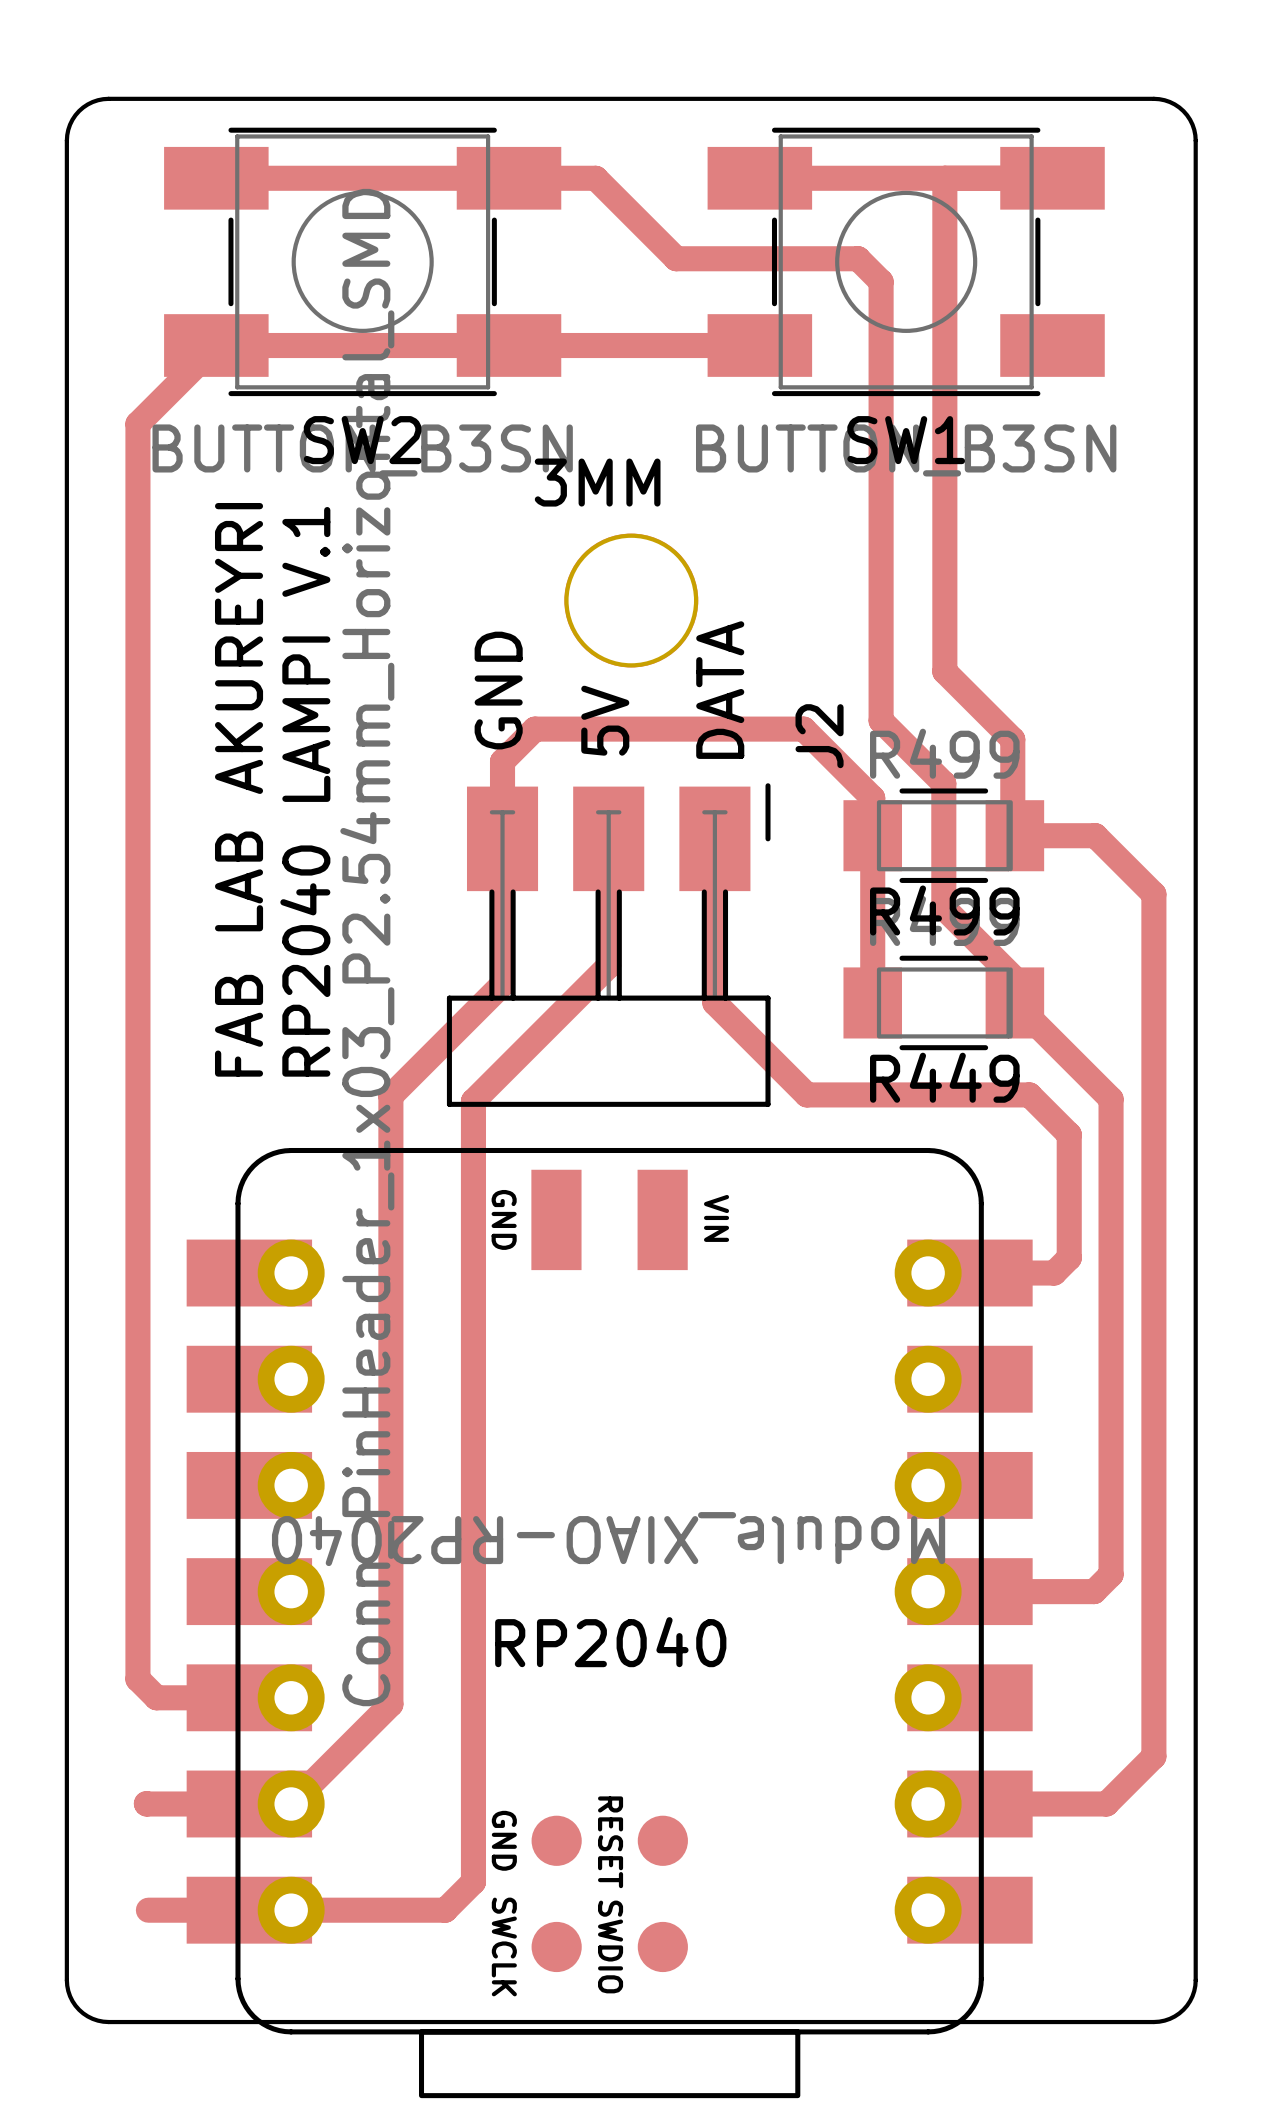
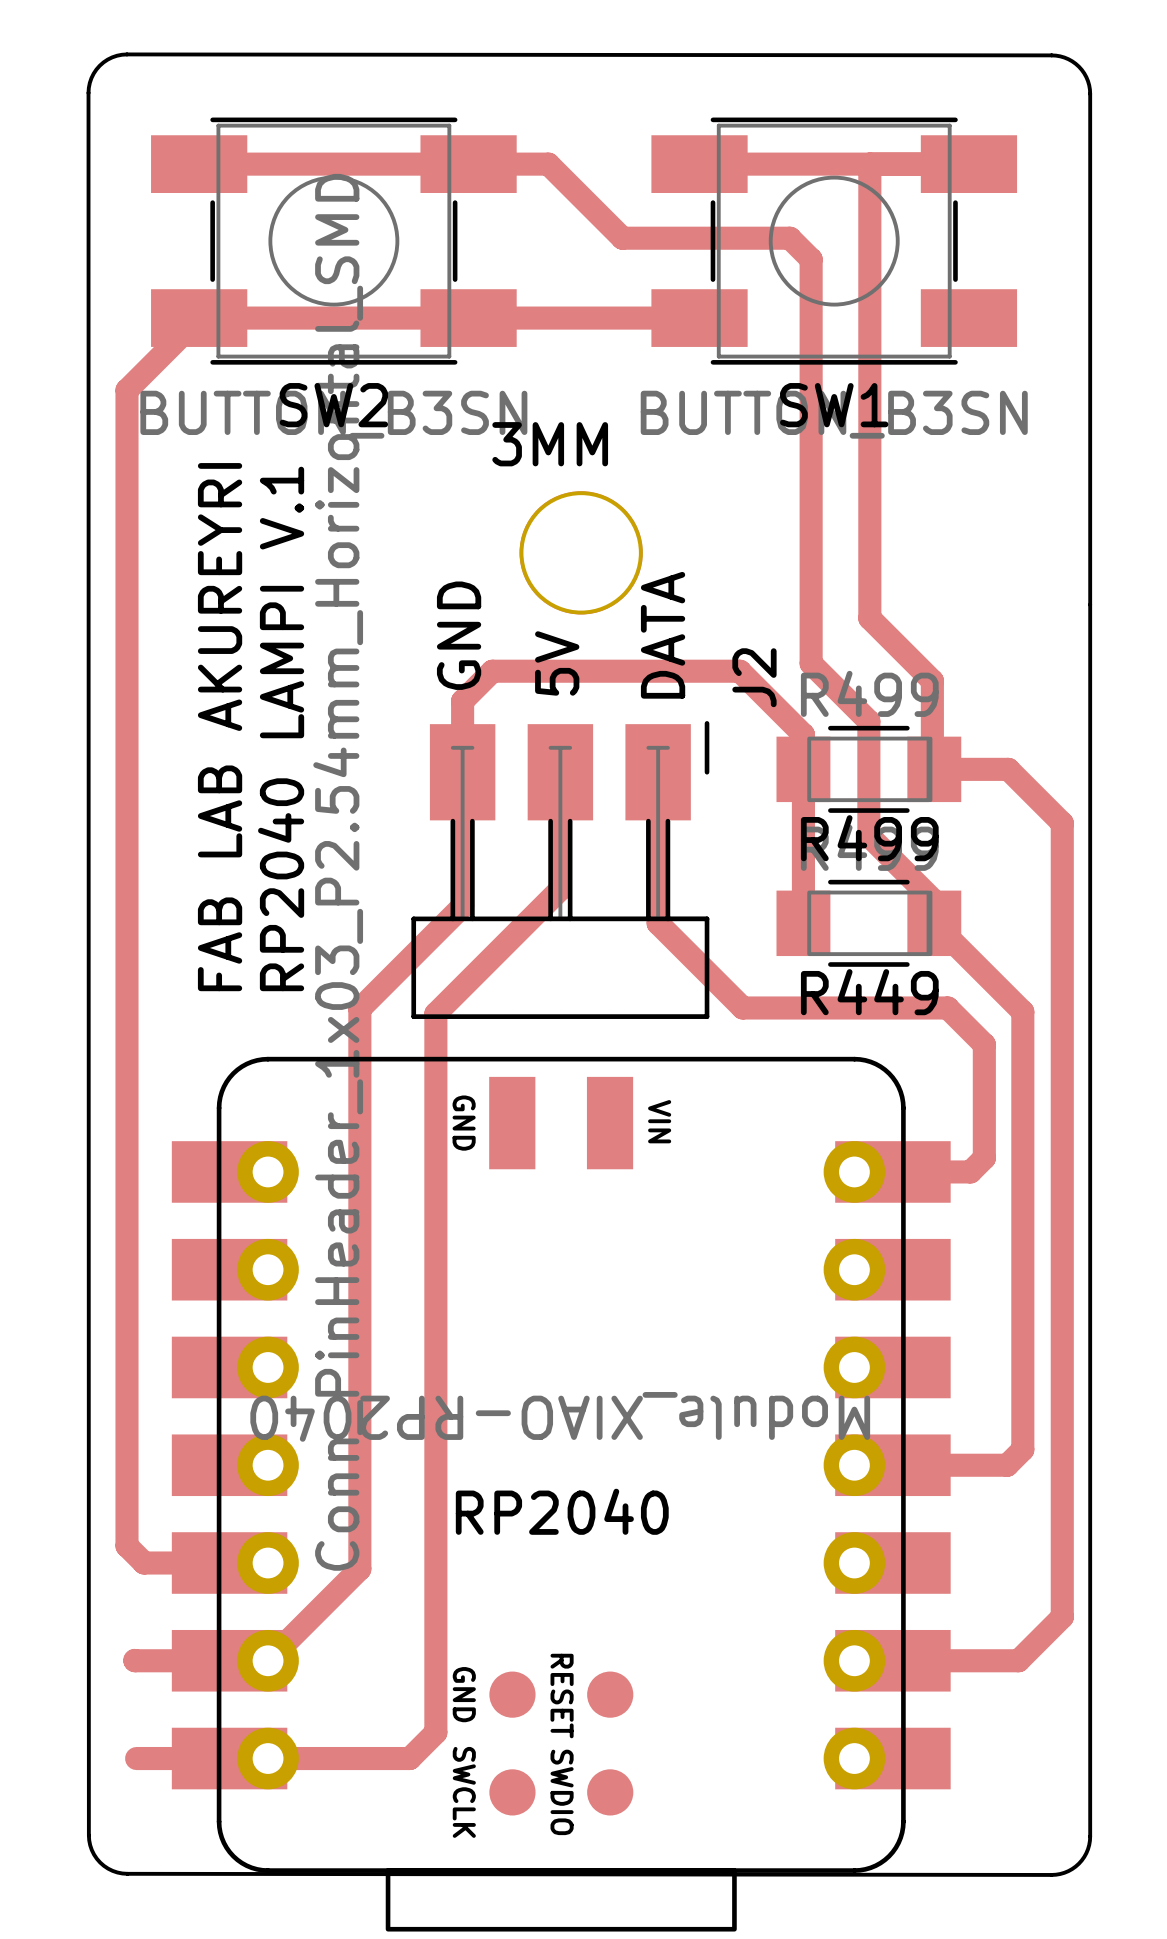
board edge: (108, 98) (1153, 98) (1174, 104) (1190, 119) (1195, 140) (1195, 1980) (1190, 2001) (1174, 2016) (1153, 2022) (108, 2022) (87, 2016) (72, 2001) (66, 1980) (66, 140) (70, 124) (79, 111) (92, 102) (108, 98) -> (126, 54) (112, 57) (99, 65) (91, 78) (88, 92) (88, 1835) (94, 1854) (108, 1868) (127, 1873) (1051, 1874) (1068, 1871) (1084, 1856) (1090, 1836) (1090, 93) (1086, 77) (1072, 61) (1051, 55) (126, 54)

